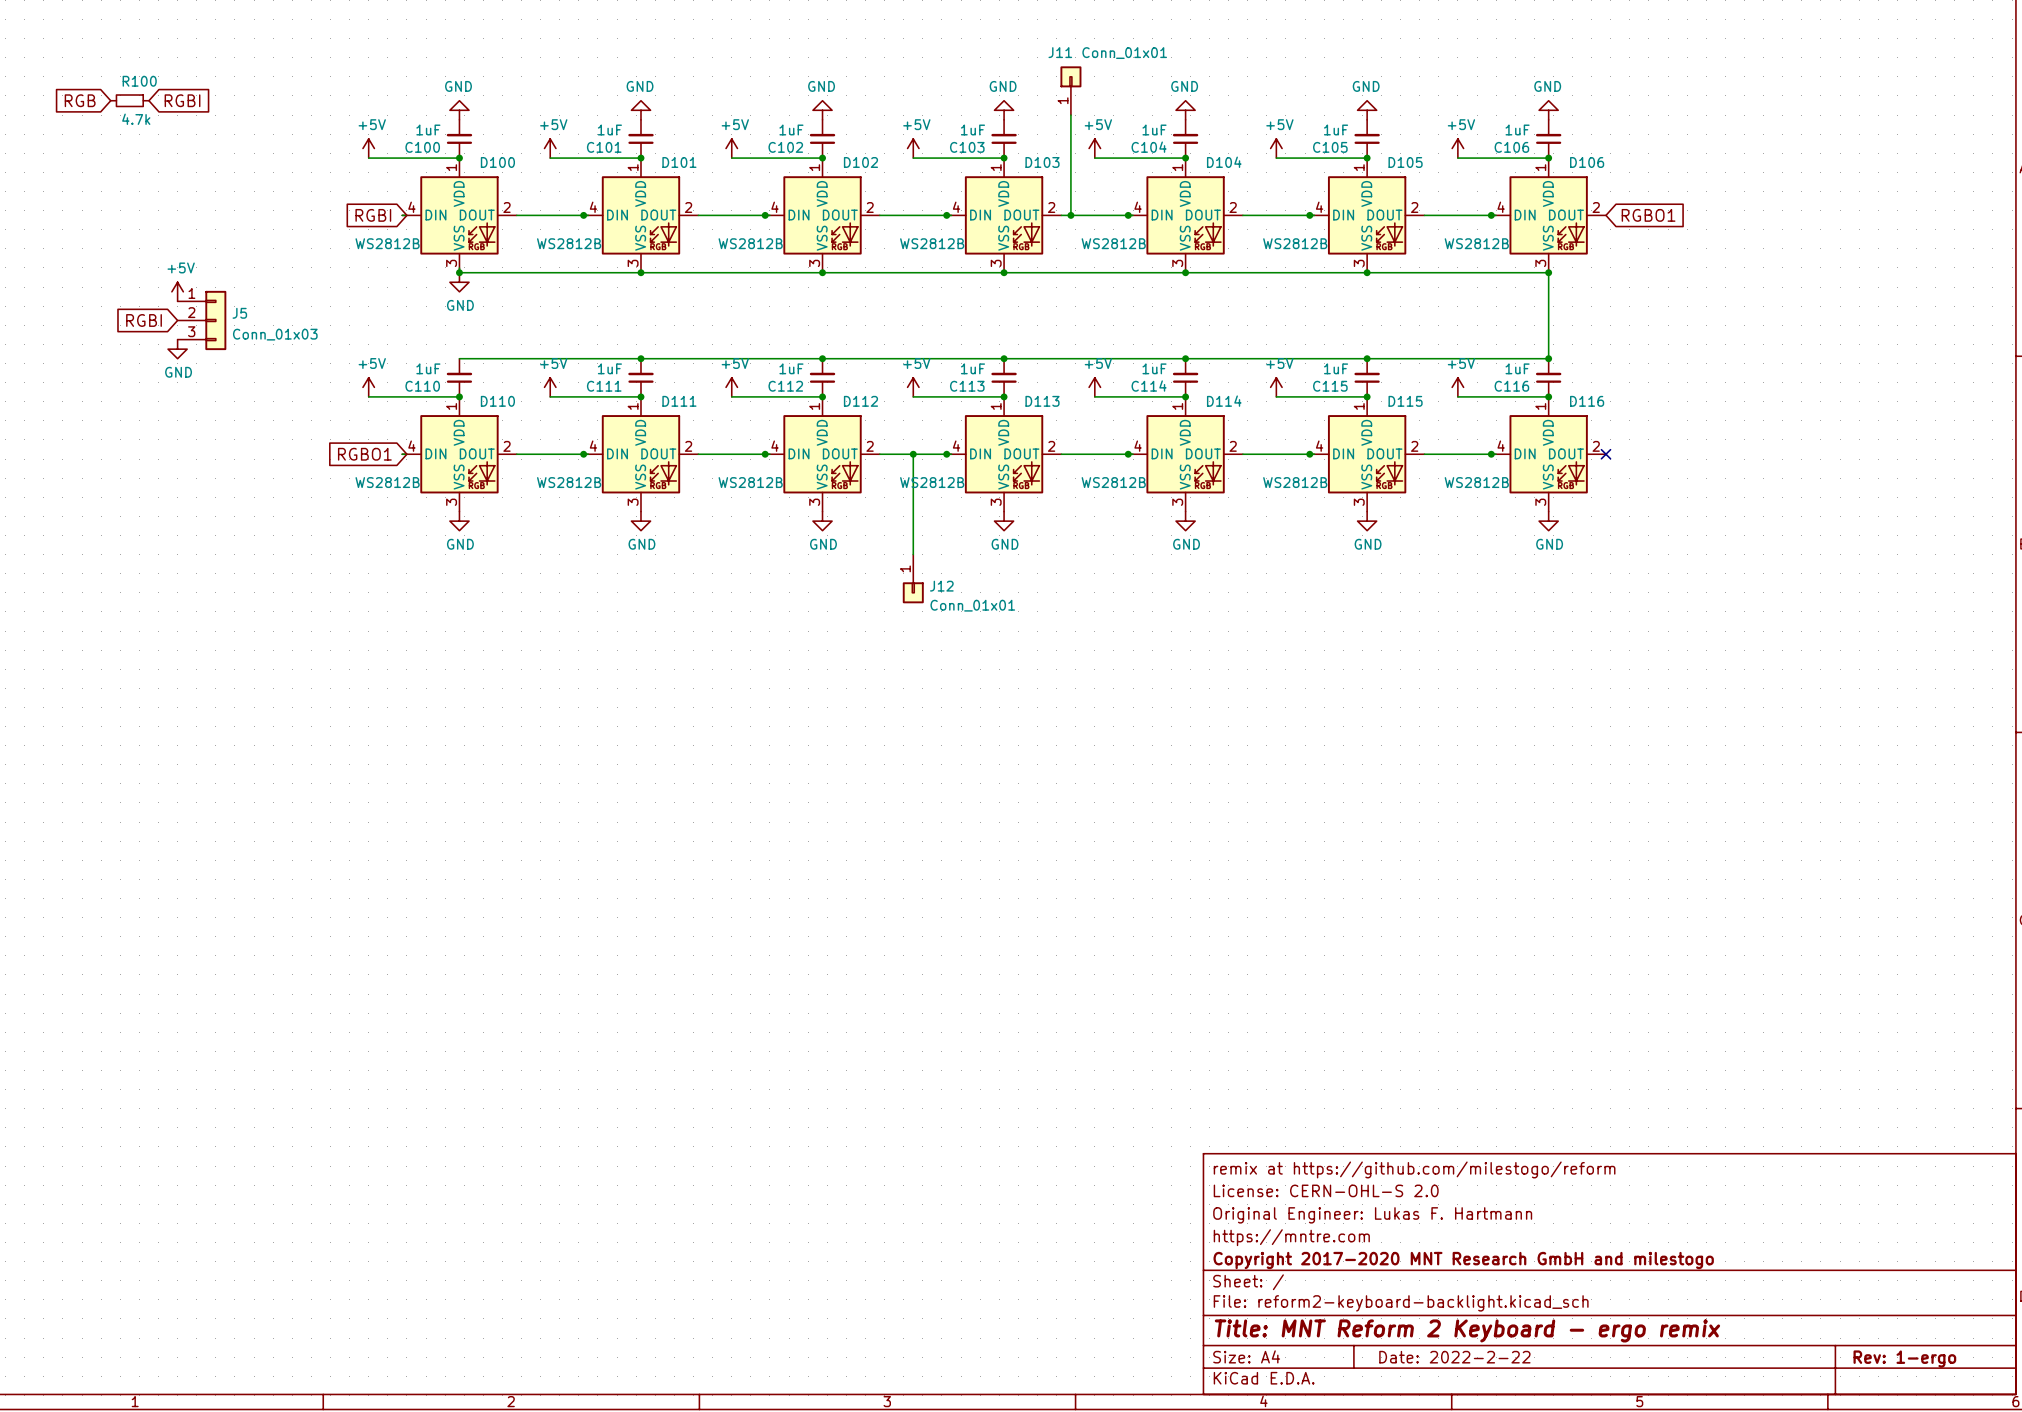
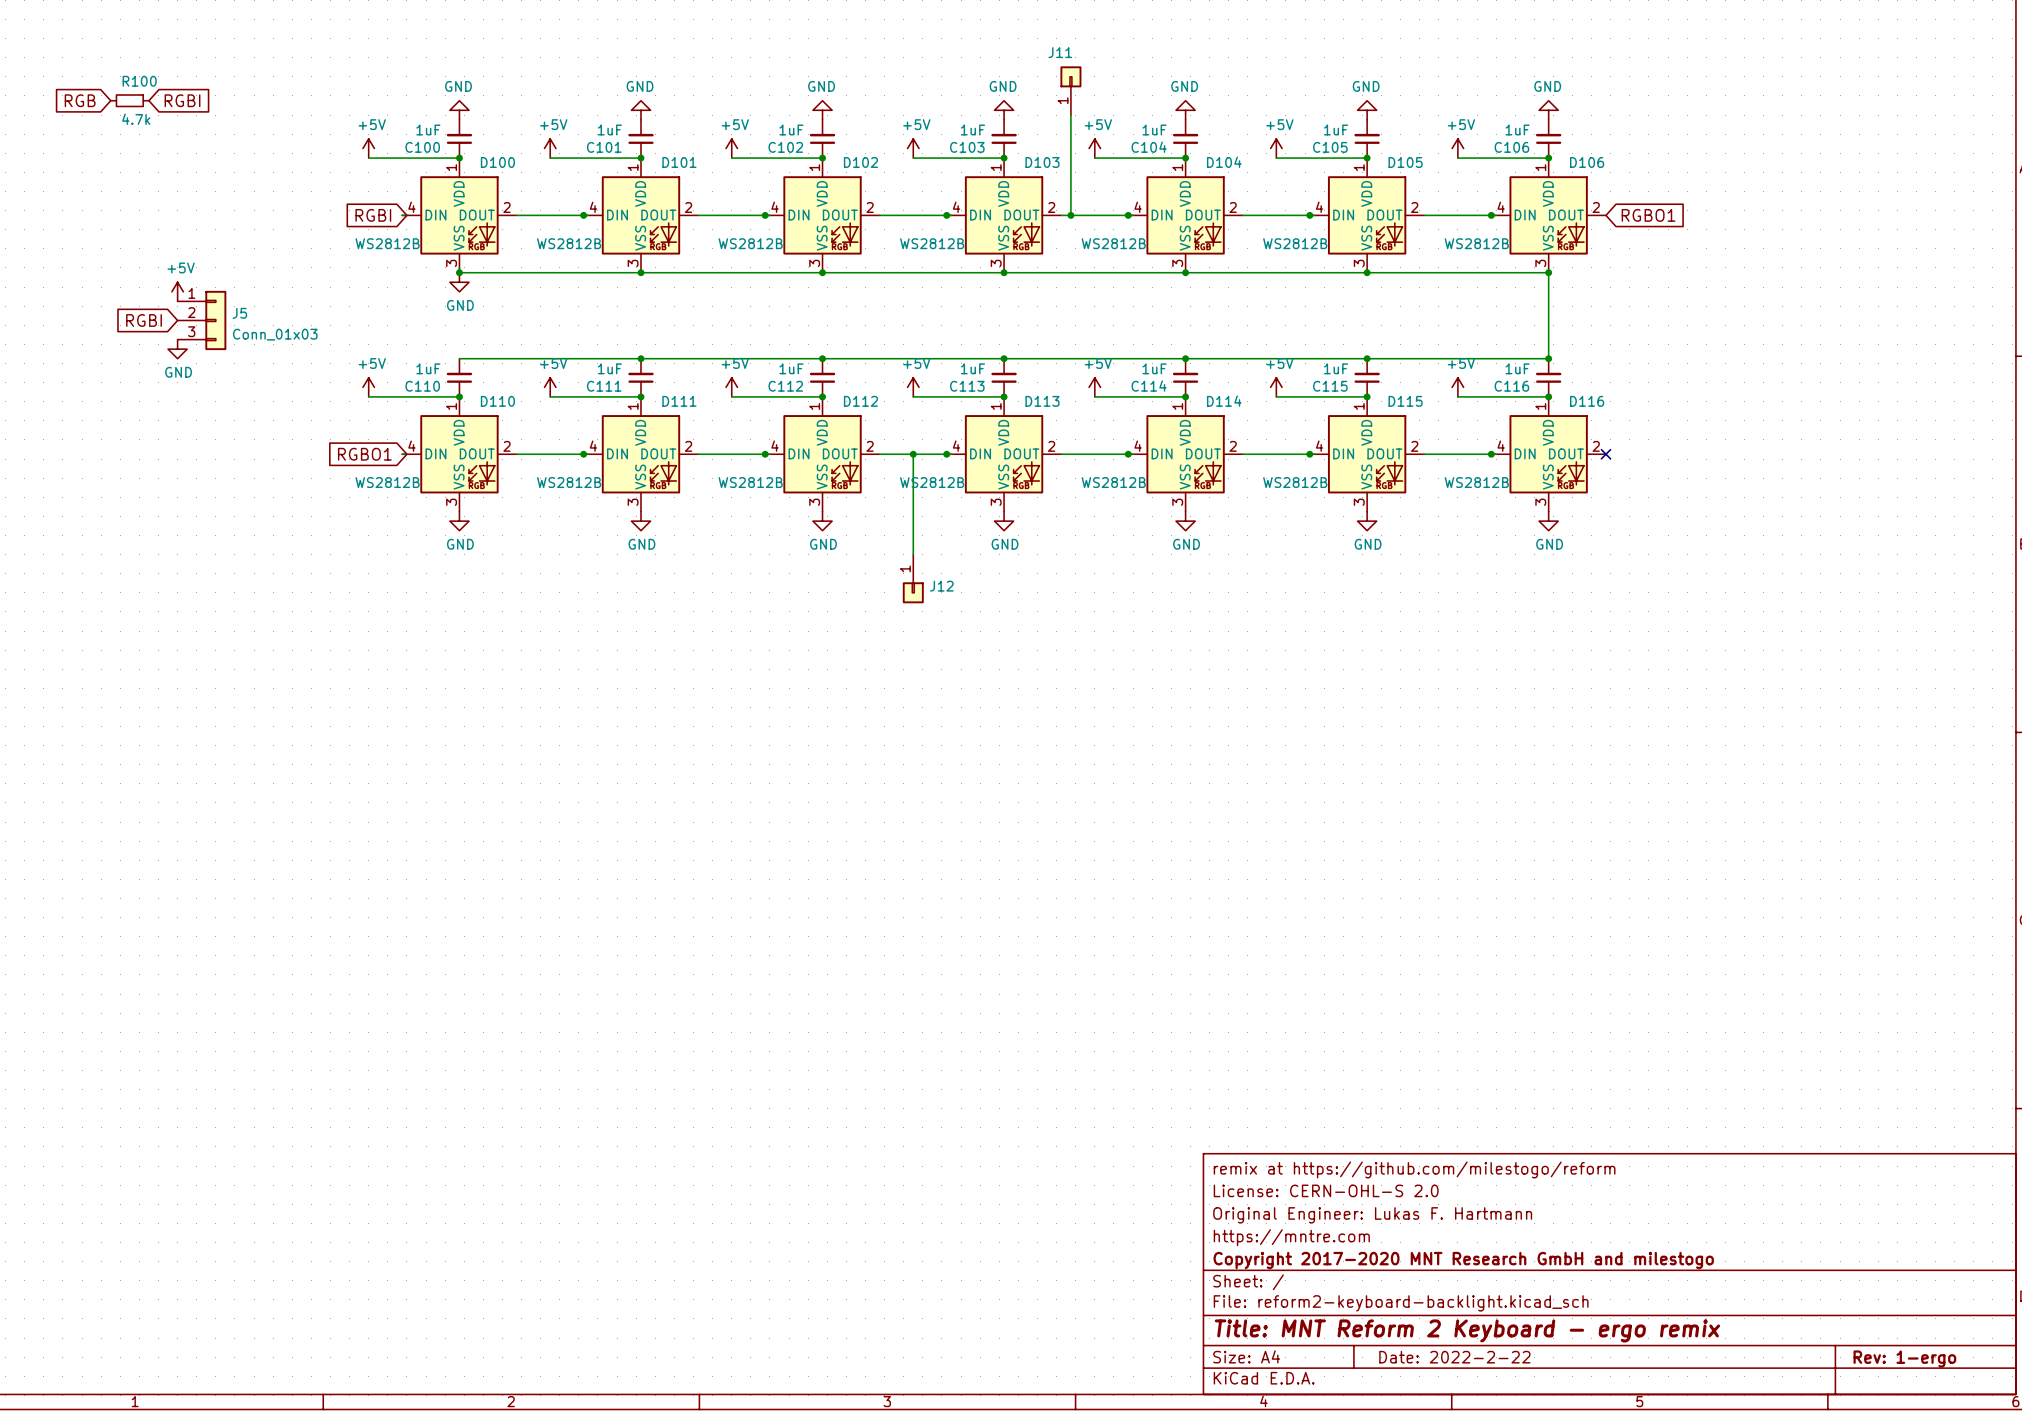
J11 value: Conn_01x01 (1124, 53) -> none
J12 value: Conn_01x01 (972, 605) -> none

